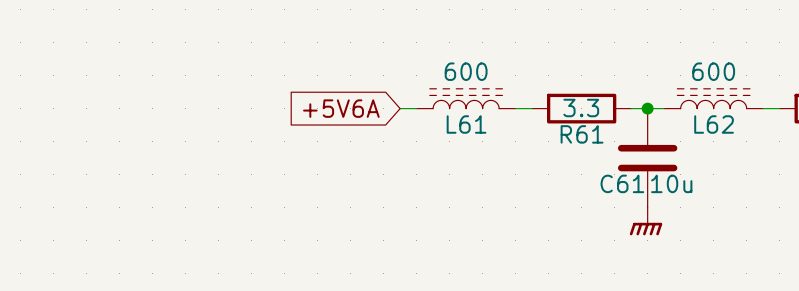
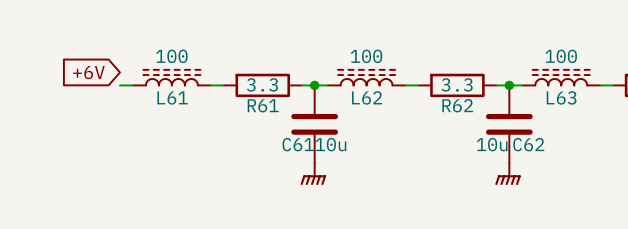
L61 value: 600 (466, 71) -> 100 (366, 56)
L62 value: 600 (713, 71) -> 100 (561, 56)
global label: none -> +6V (88, 72)
L61: none -> 100 (171, 77)
wire: none -> (120, 85) (132, 85)
wire: none -> (210, 85) (223, 85)
R61: none -> 3.3 (262, 85)
global label: +5V6A (341, 108) -> none
wire: none -> (301, 85) (314, 85)
junction: none -> (314, 85)
L61 name: L61 (466, 124) -> L62 (367, 97)
L62 name: L62 (714, 124) -> L63 (561, 97)
R61 name: R61 (582, 134) -> R62 (457, 105)
C61: none -> 10u (314, 124)
C61 name: C61 (622, 183) -> C62 (528, 144)
C61 value position: 10u (671, 183) -> 10u (492, 144)
power symbol: none -> (313, 174)

